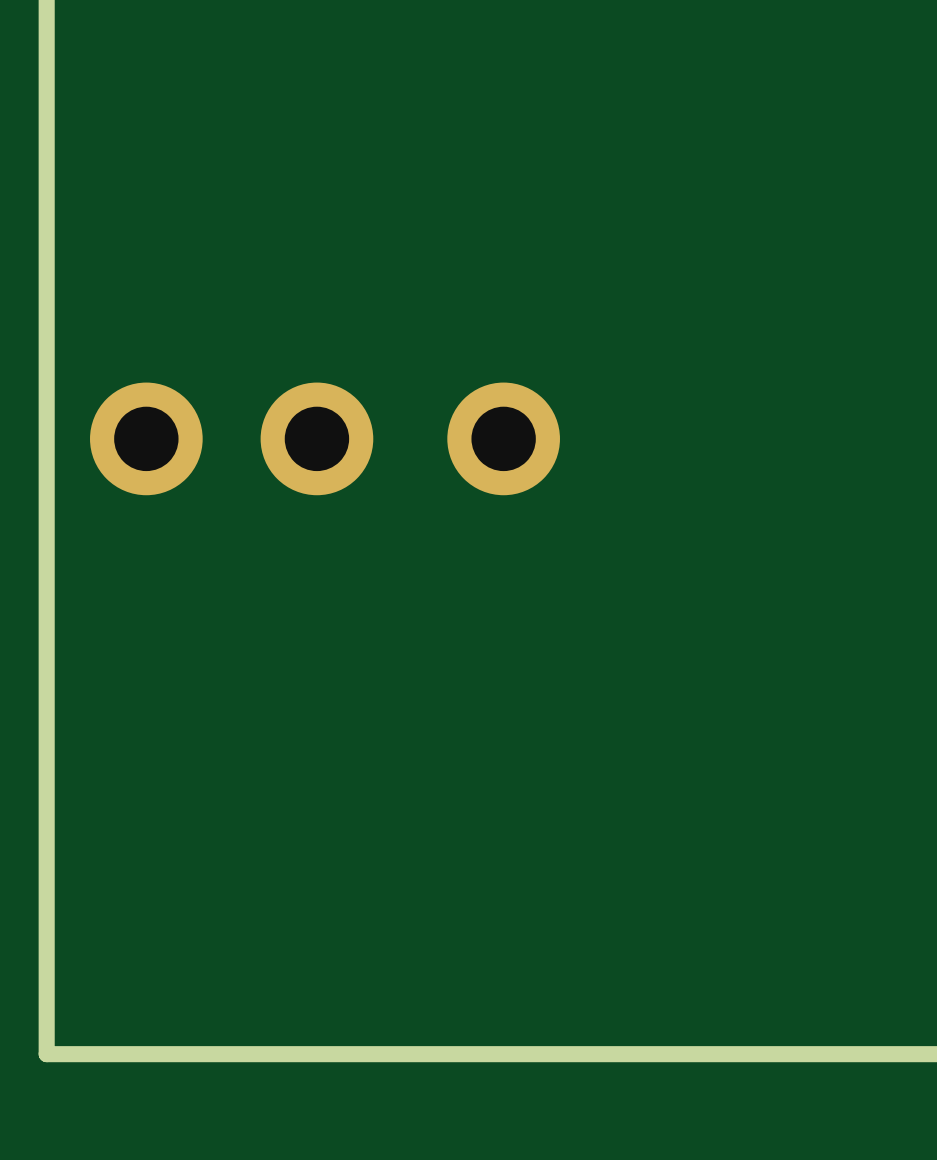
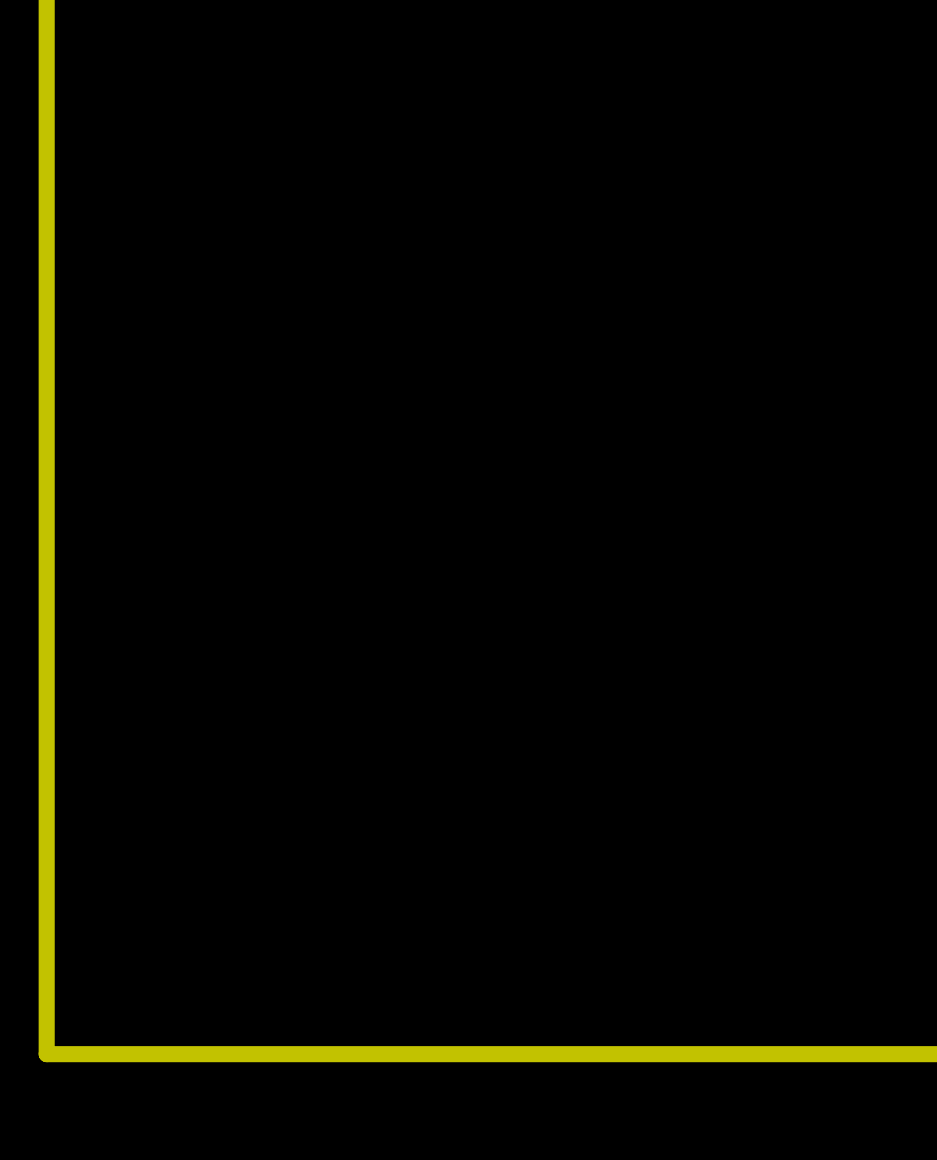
part: (324, 438) -> none

